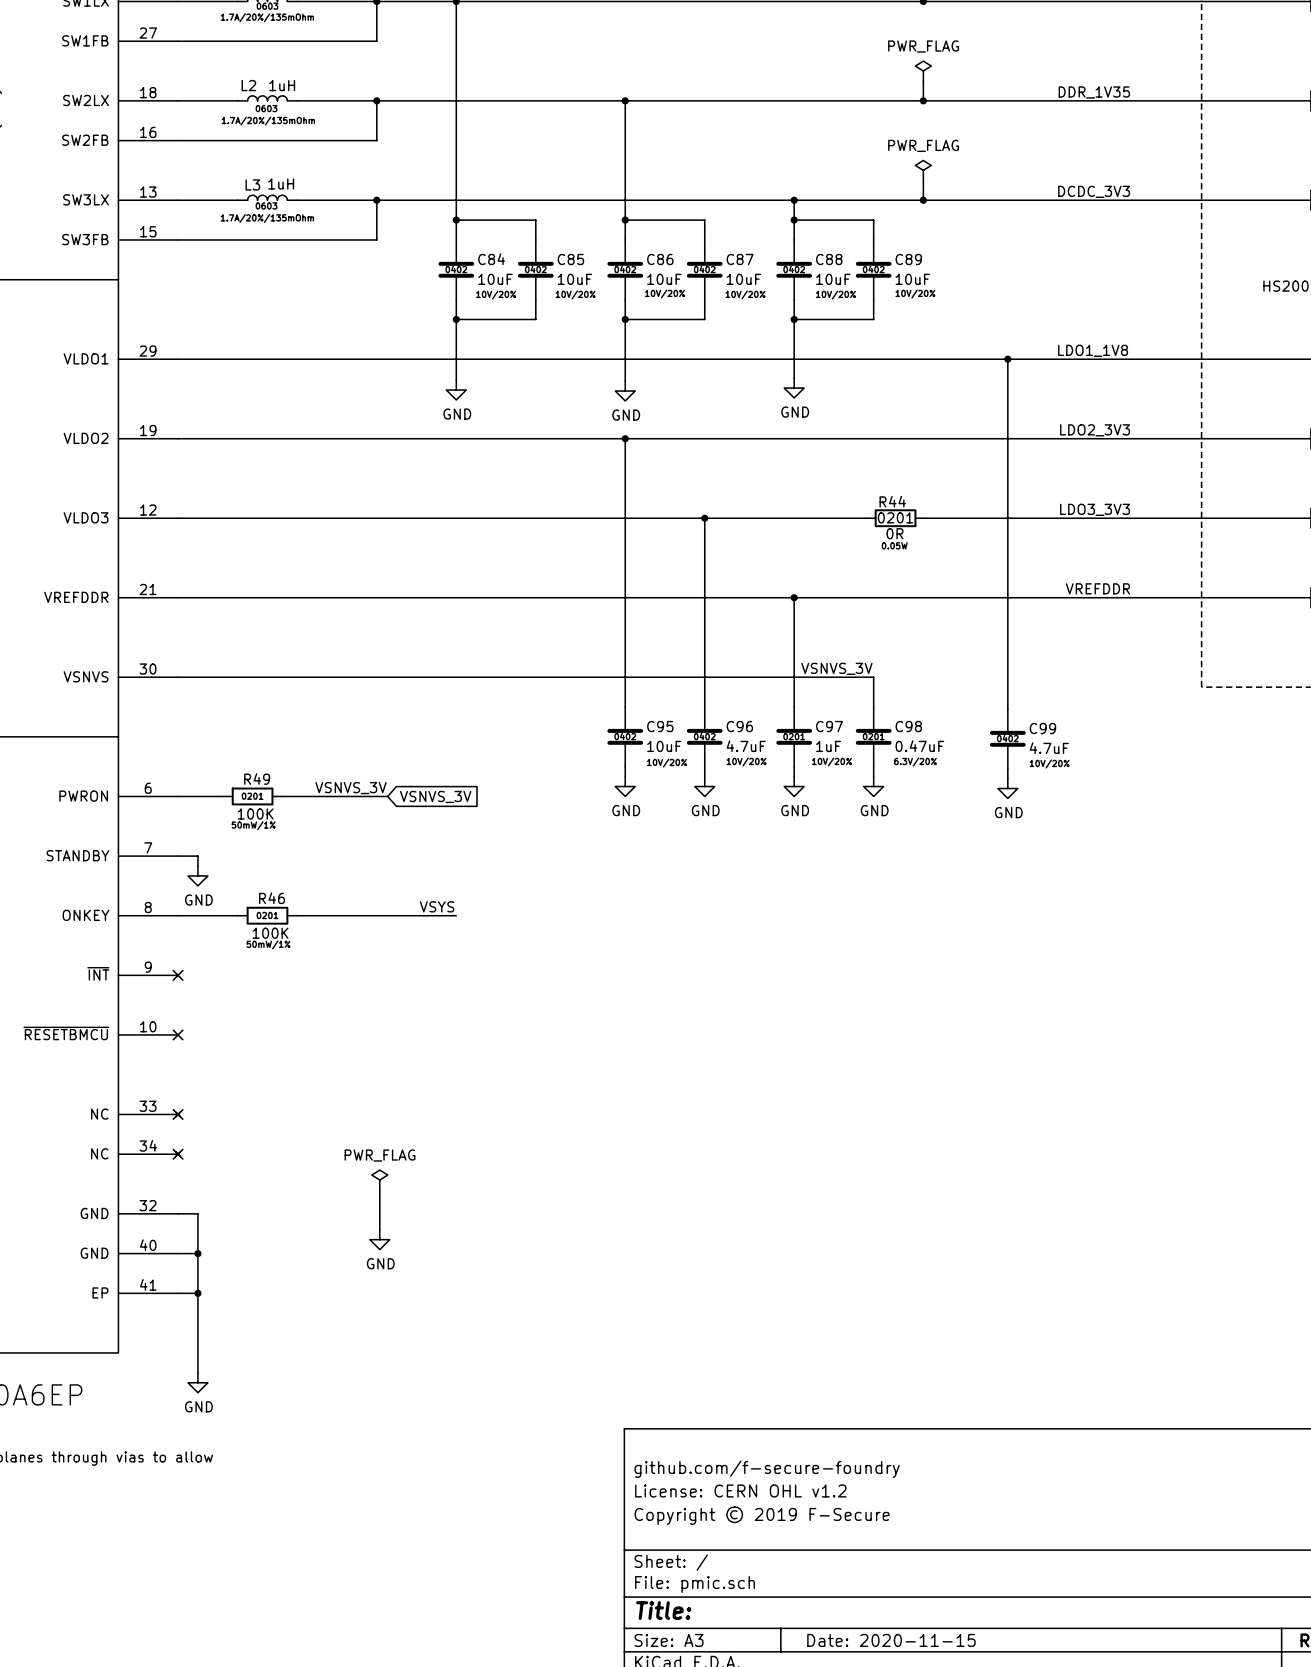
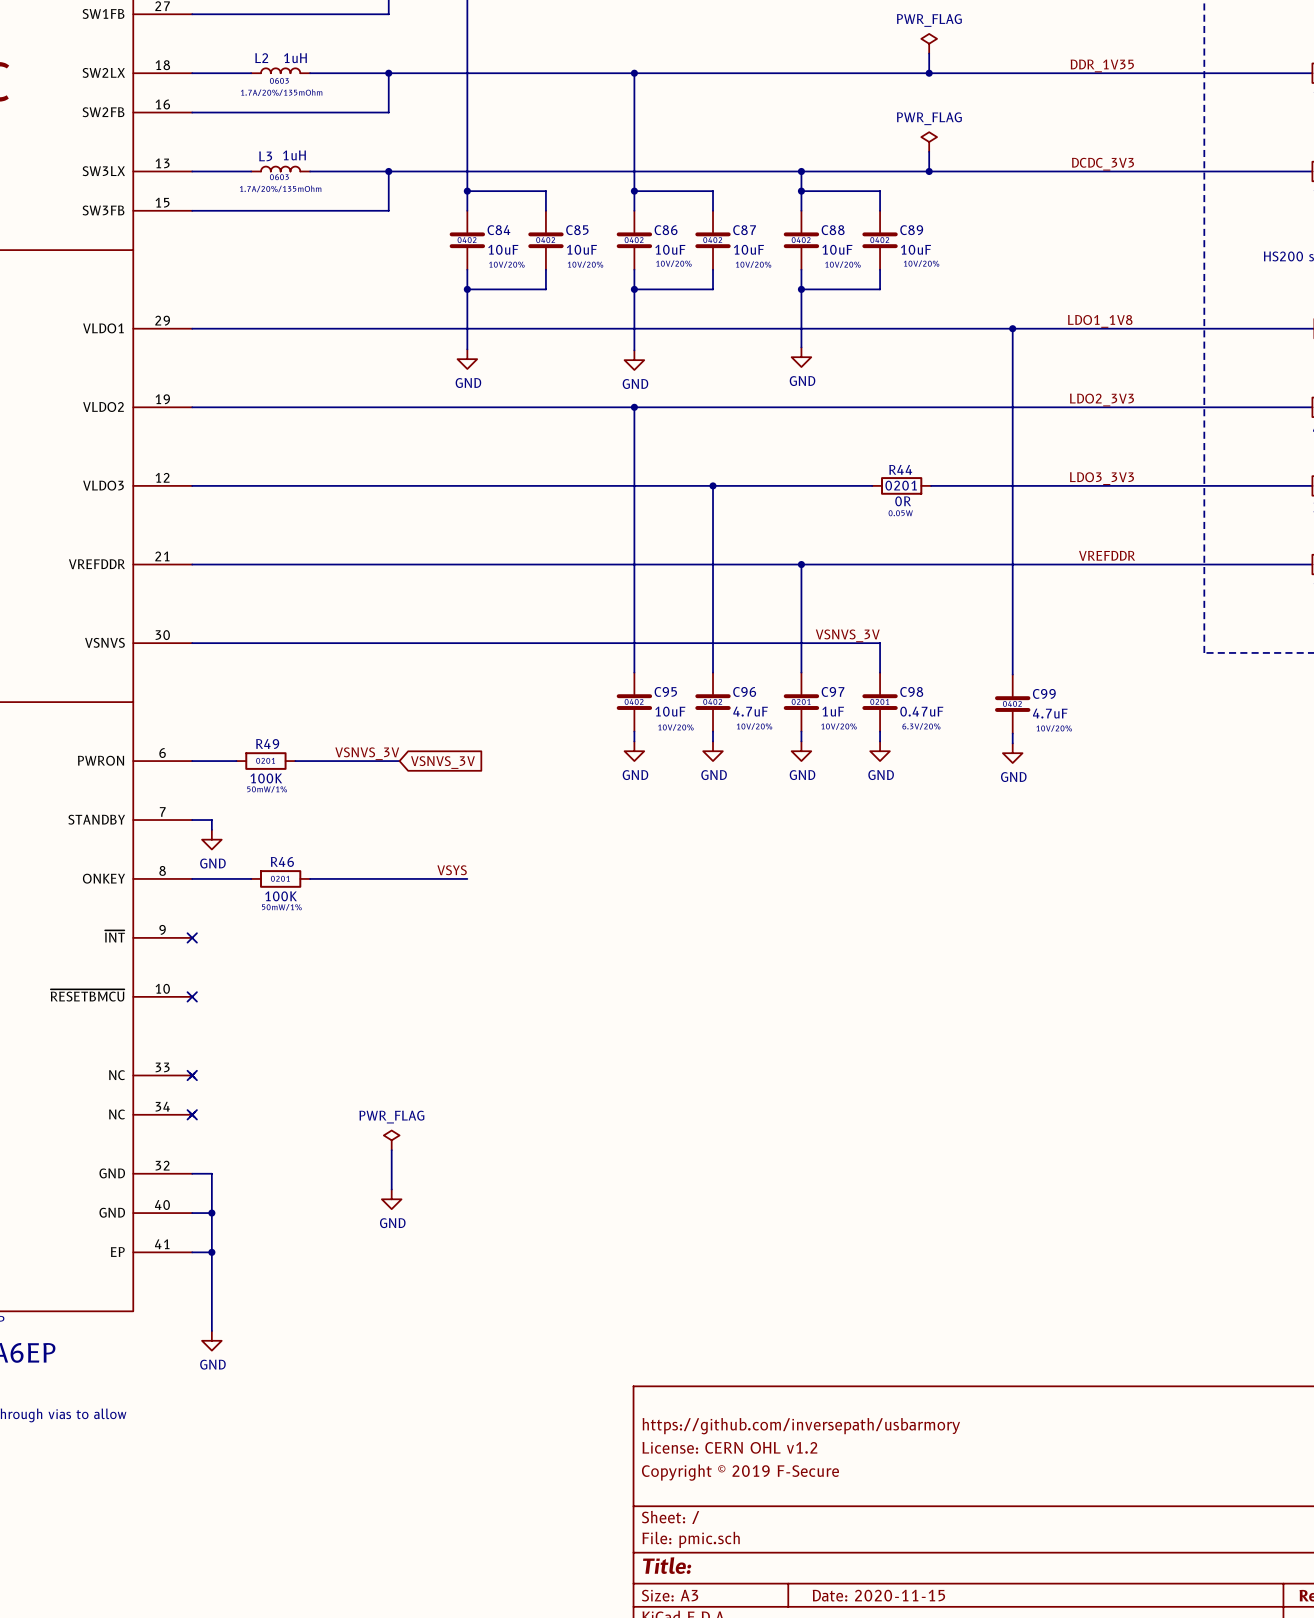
title block: github.com/f-secure-foundry (767, 1469) -> https://github.com/inversepath/usbarmory (801, 1426)

